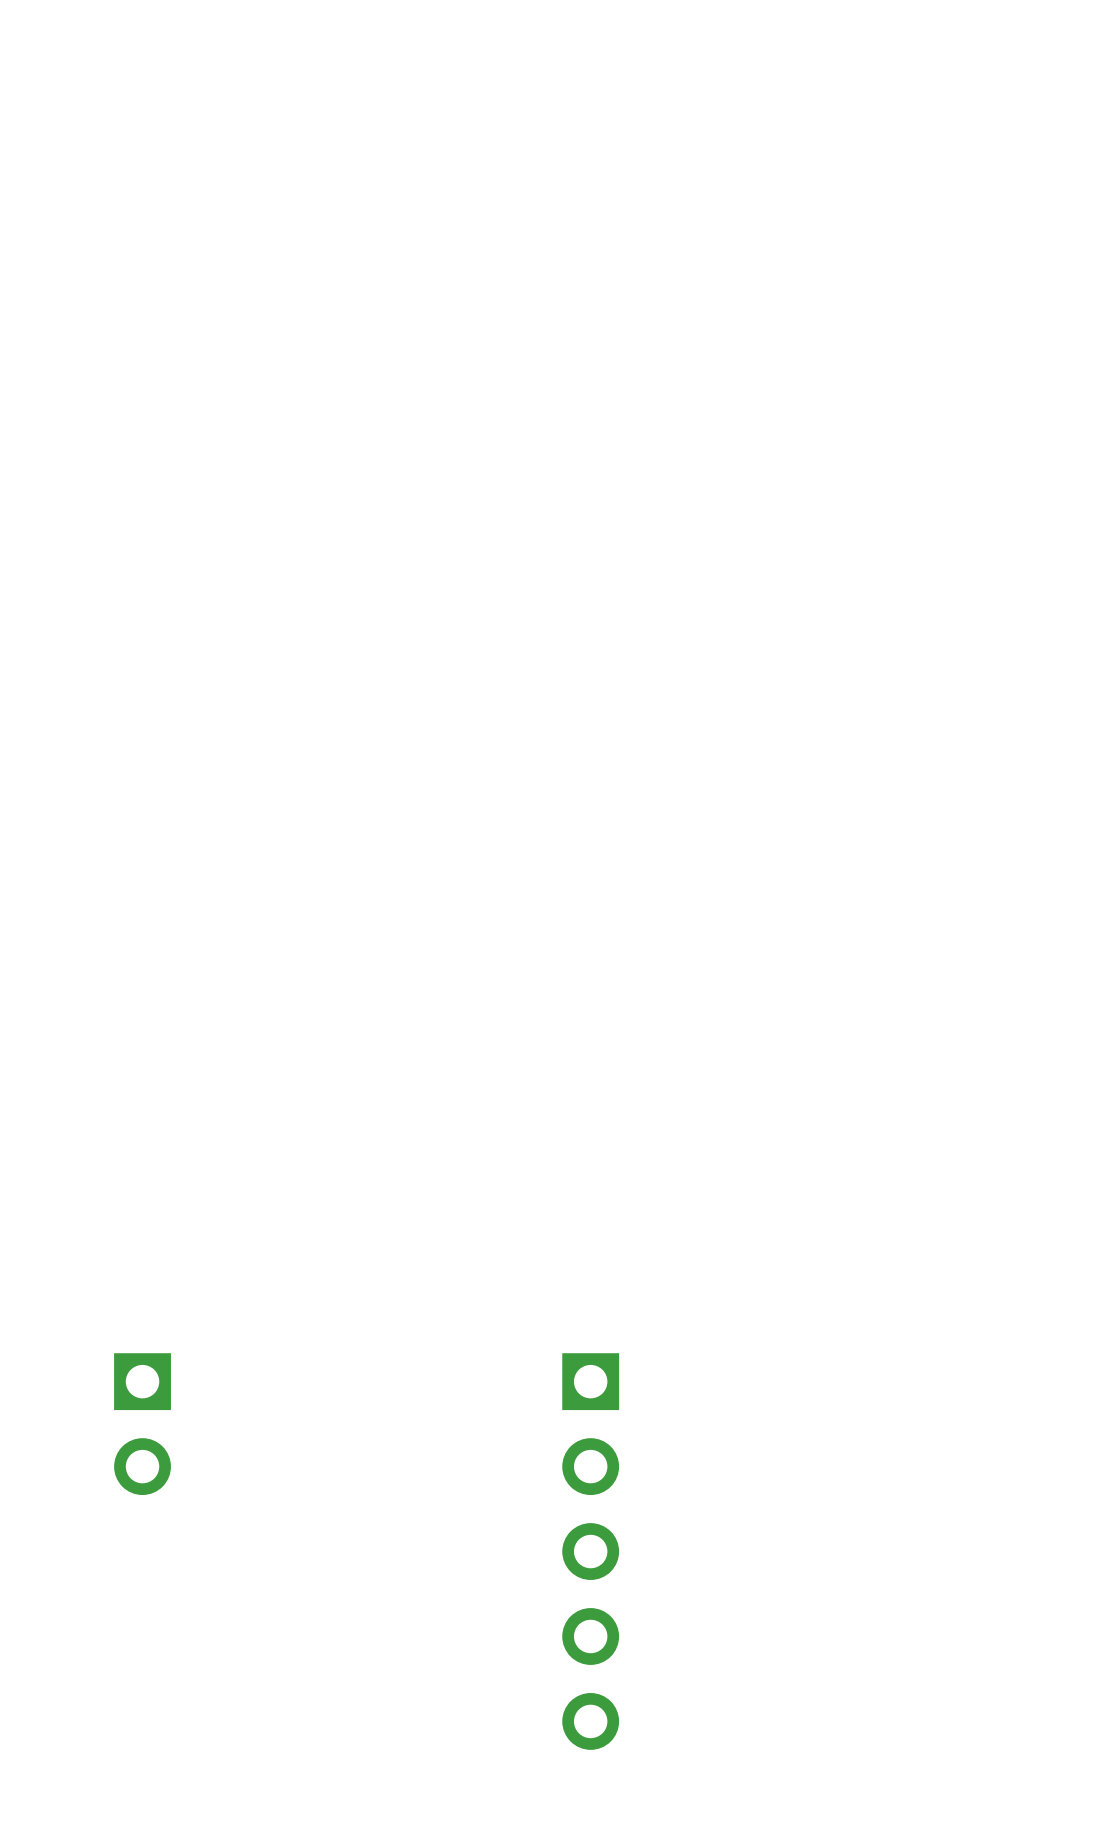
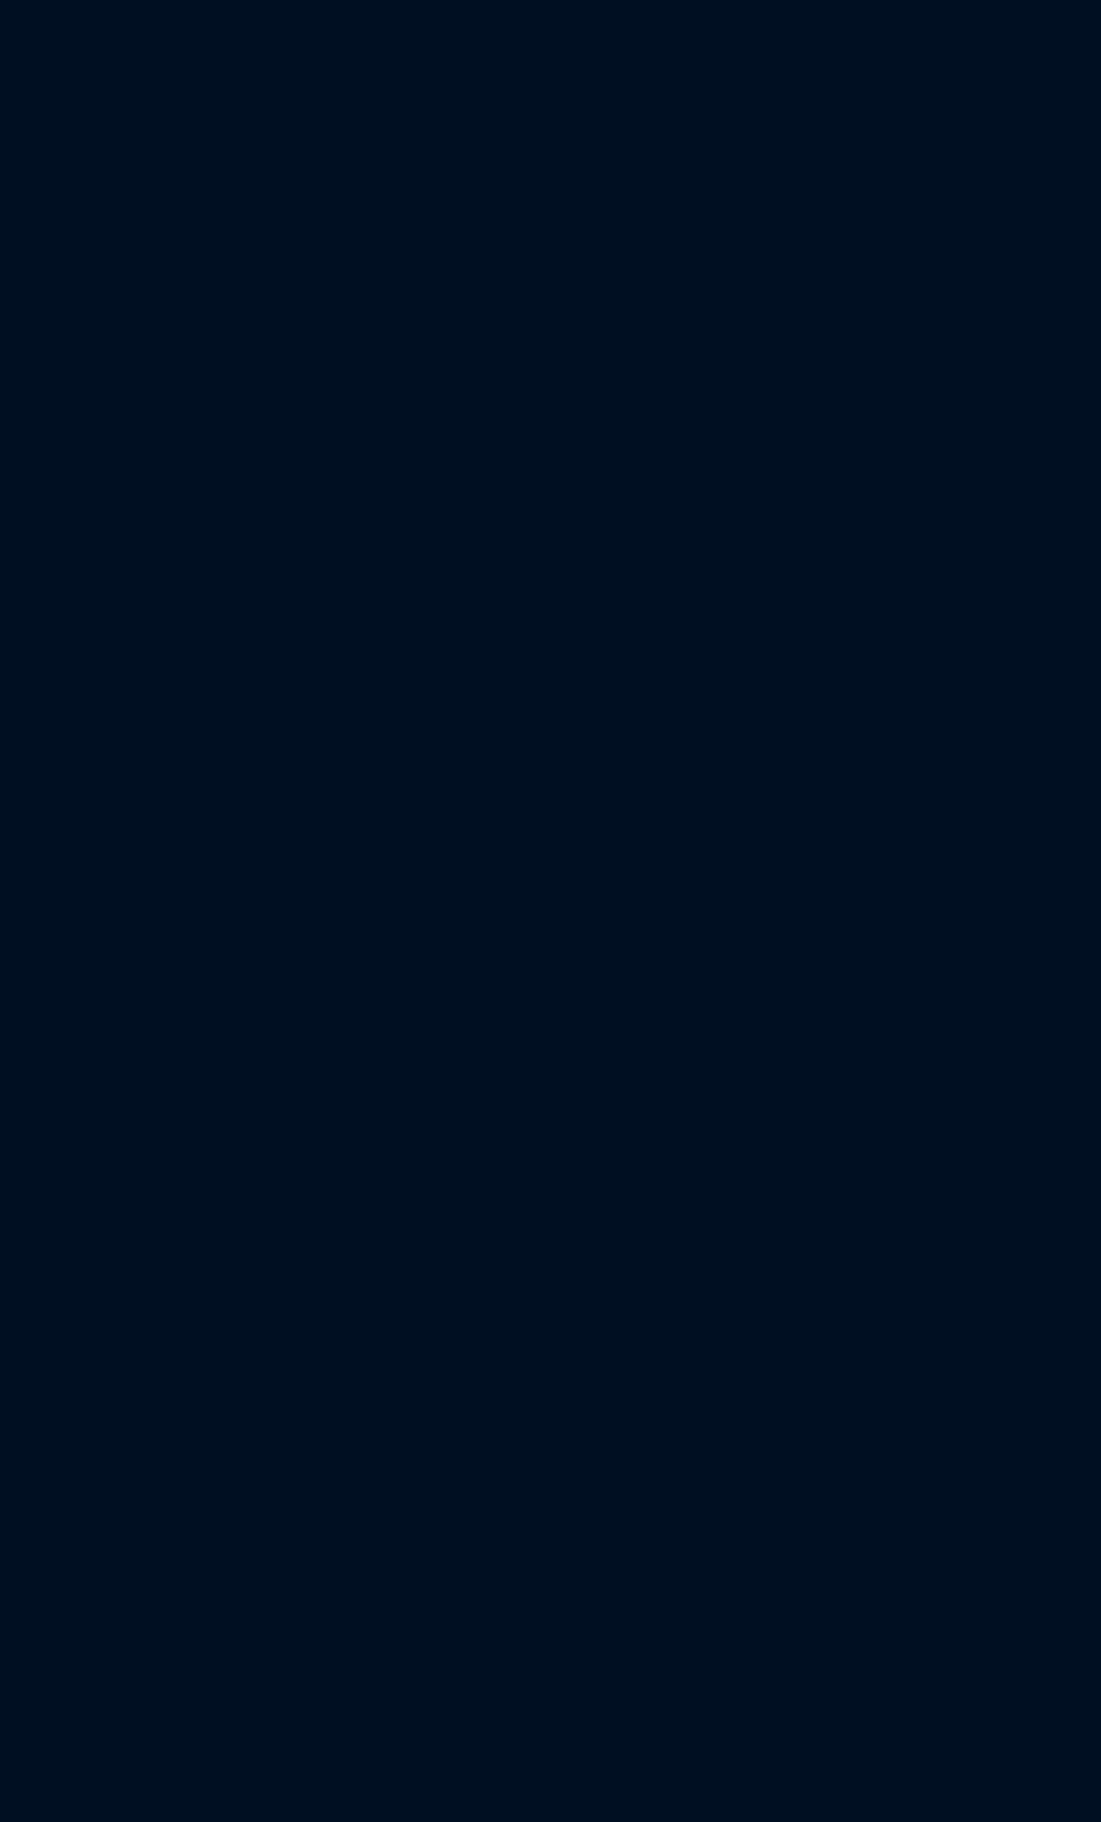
part: (142, 1424) -> none
part: (590, 1551) -> none

